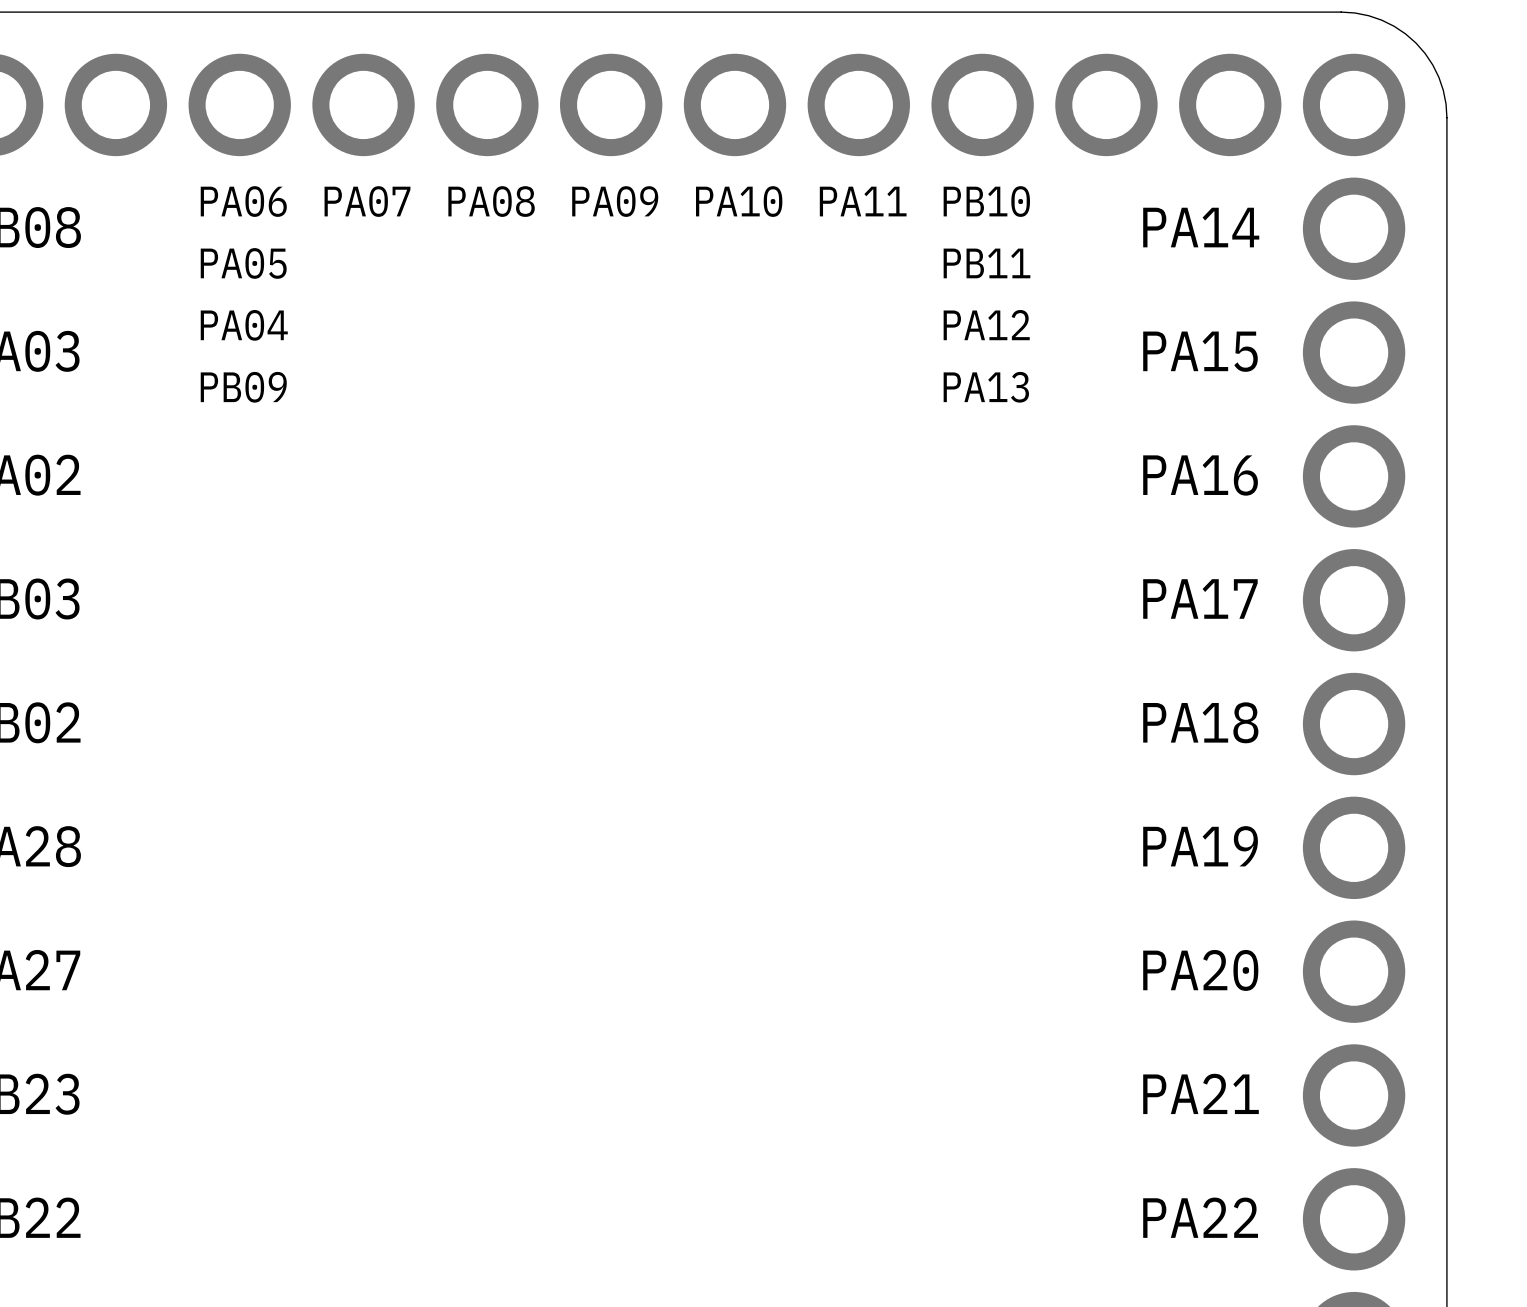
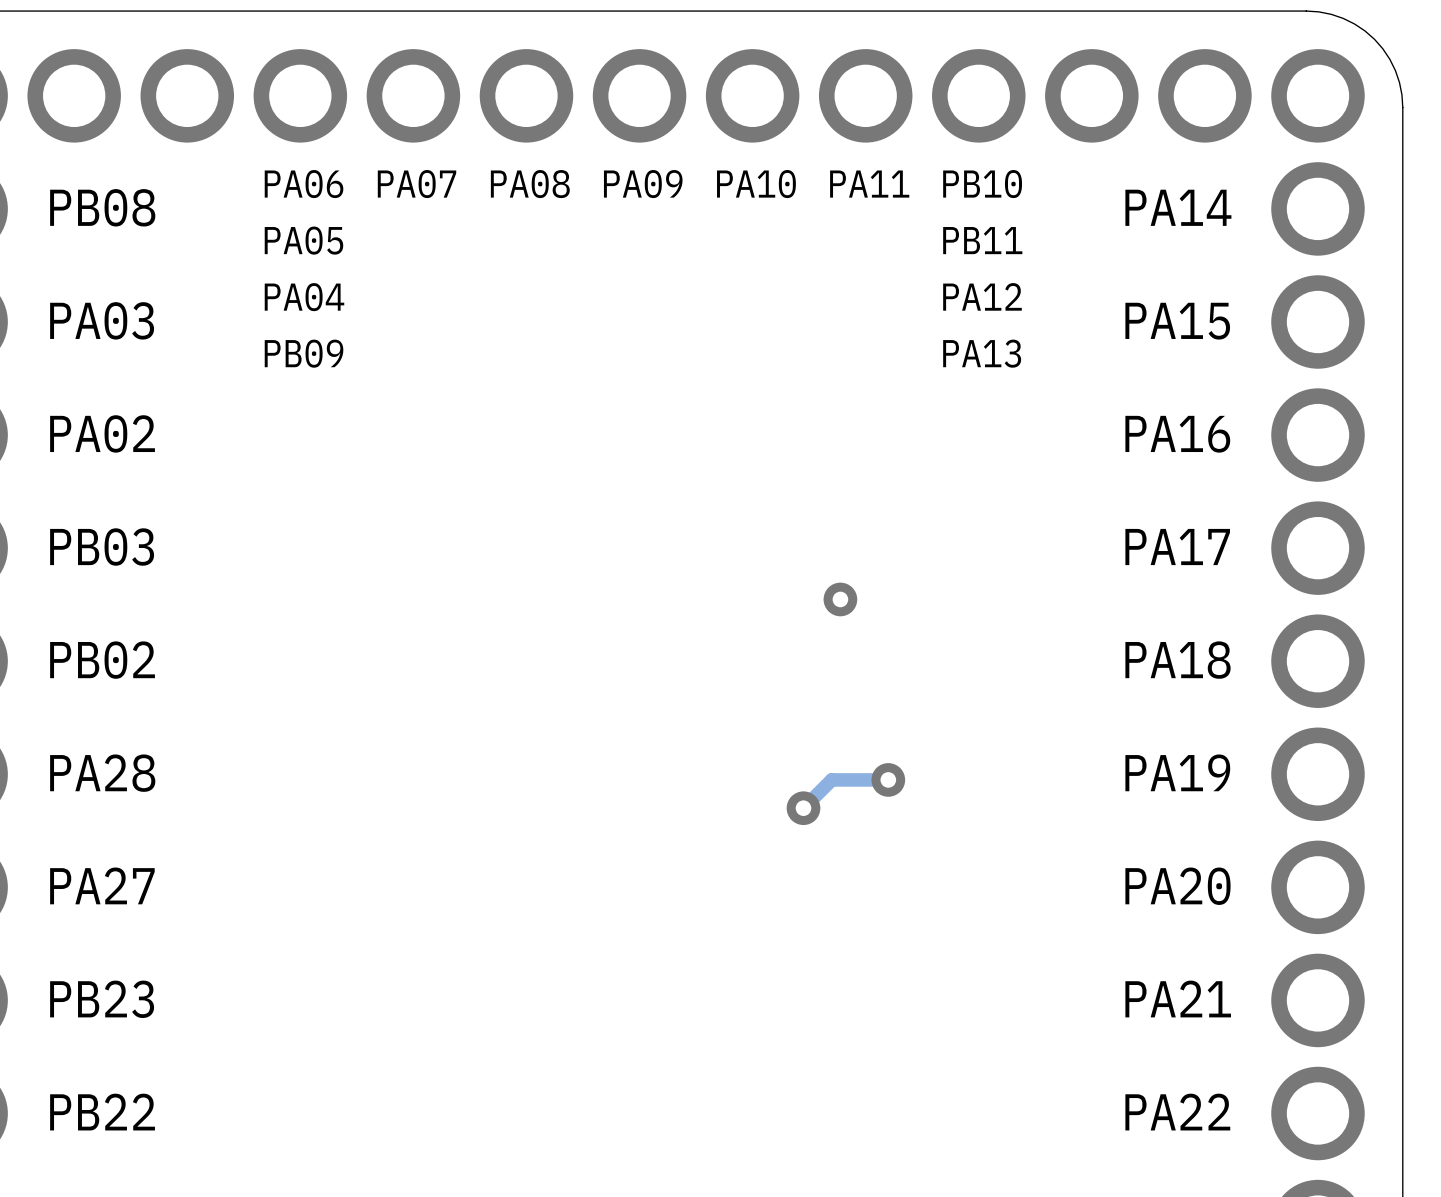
via: none -> (840, 599)
track: none -> (888, 779) (831, 779) (803, 808)
via: none -> (888, 779)
via: none -> (803, 808)

